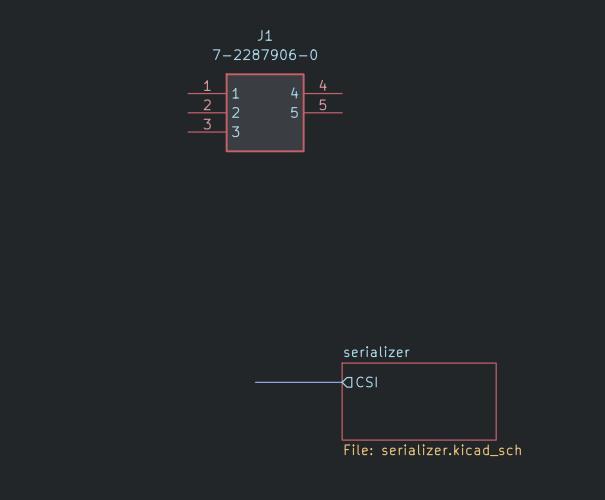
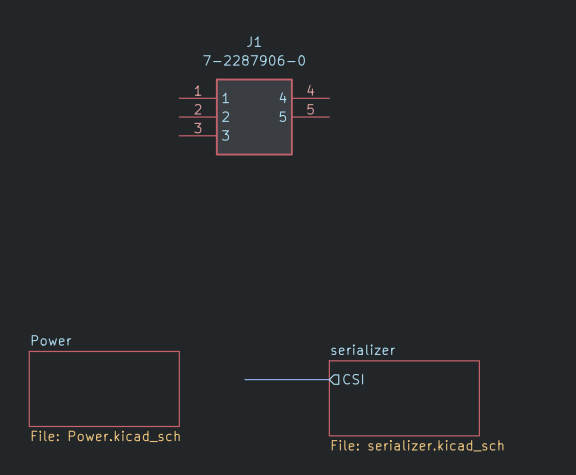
sheet Power: none -> File: Power.kicad_sch (104, 388)

